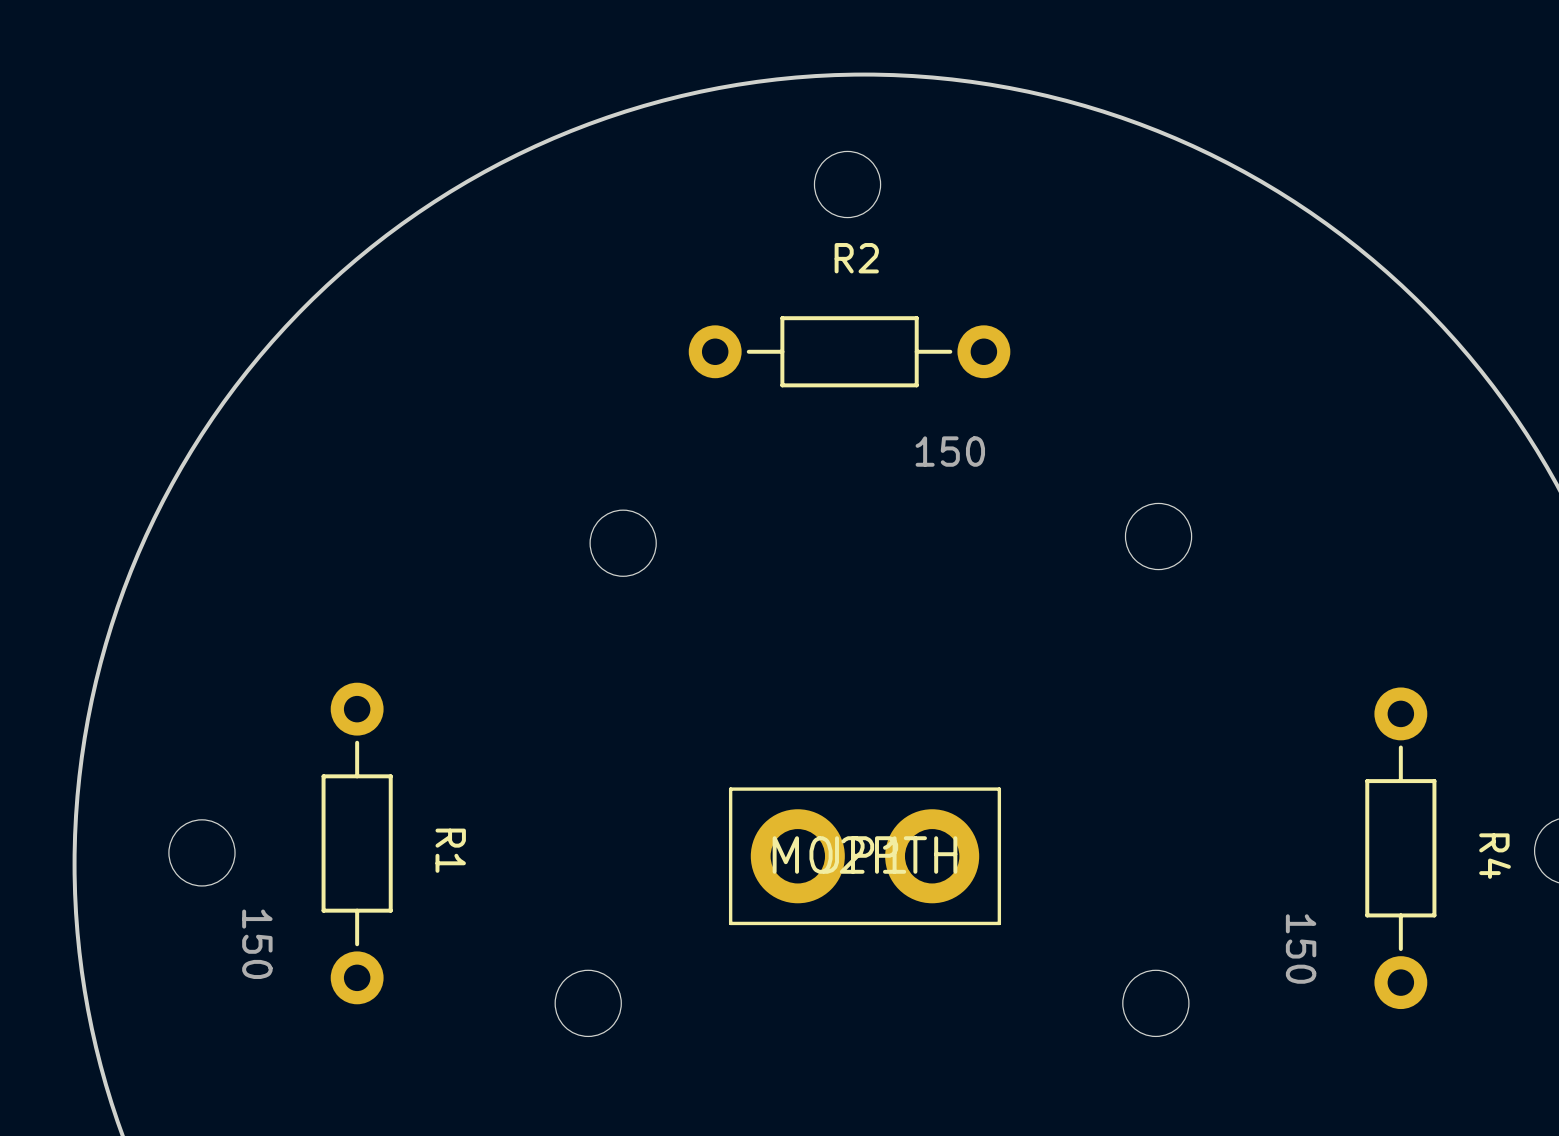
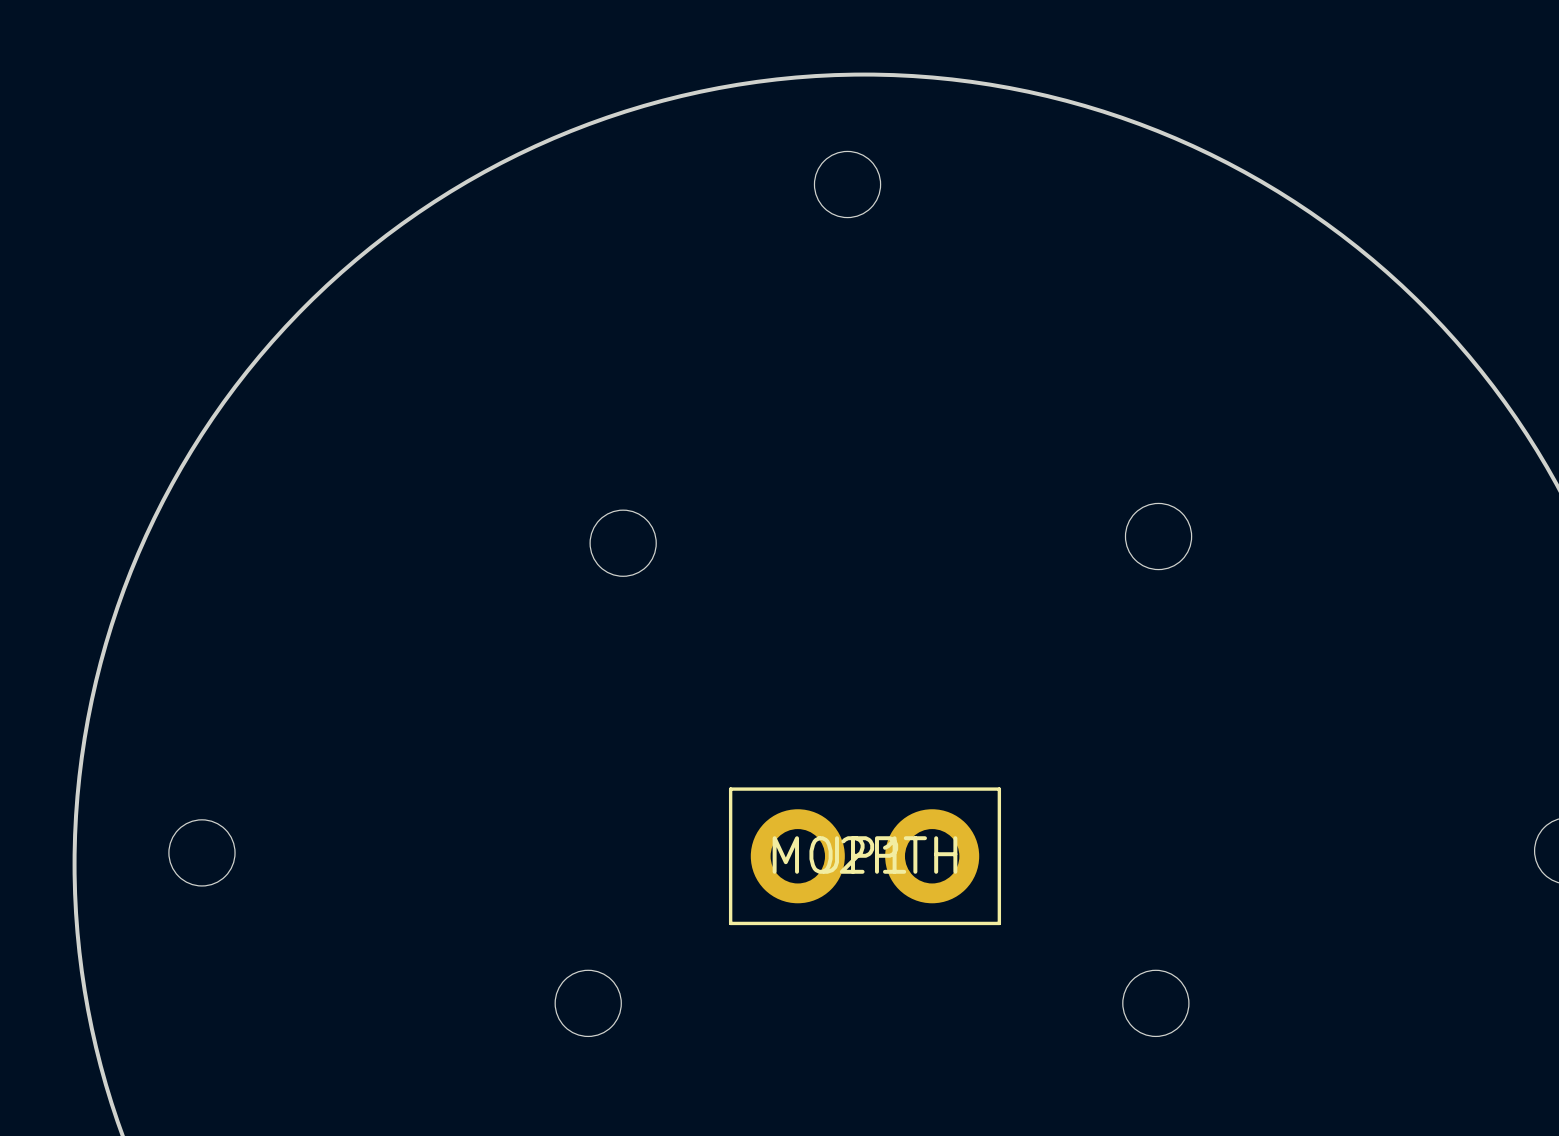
R2: 150 (849, 351) -> none
R1: 150 (357, 843) -> none
R4: 150 (1400, 848) -> none

